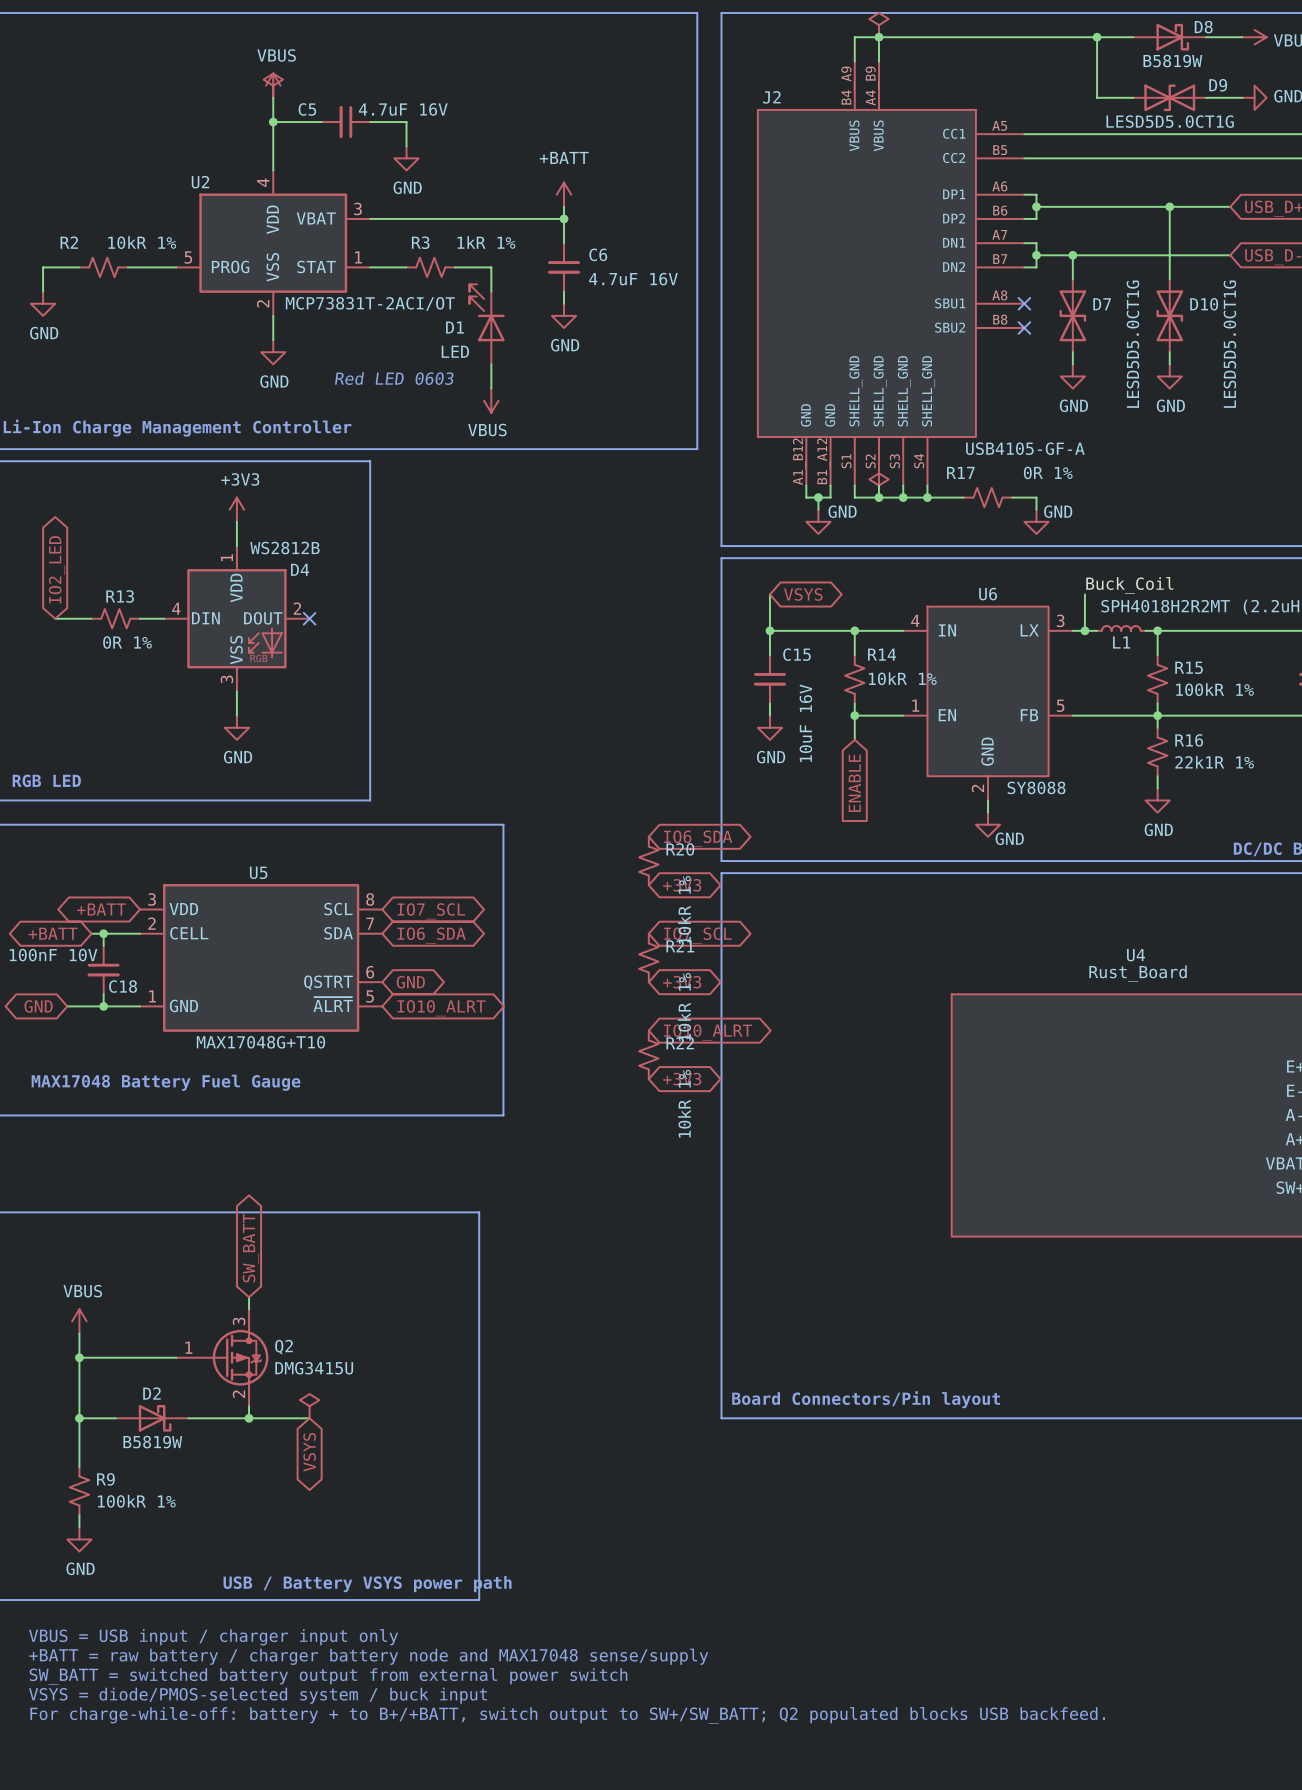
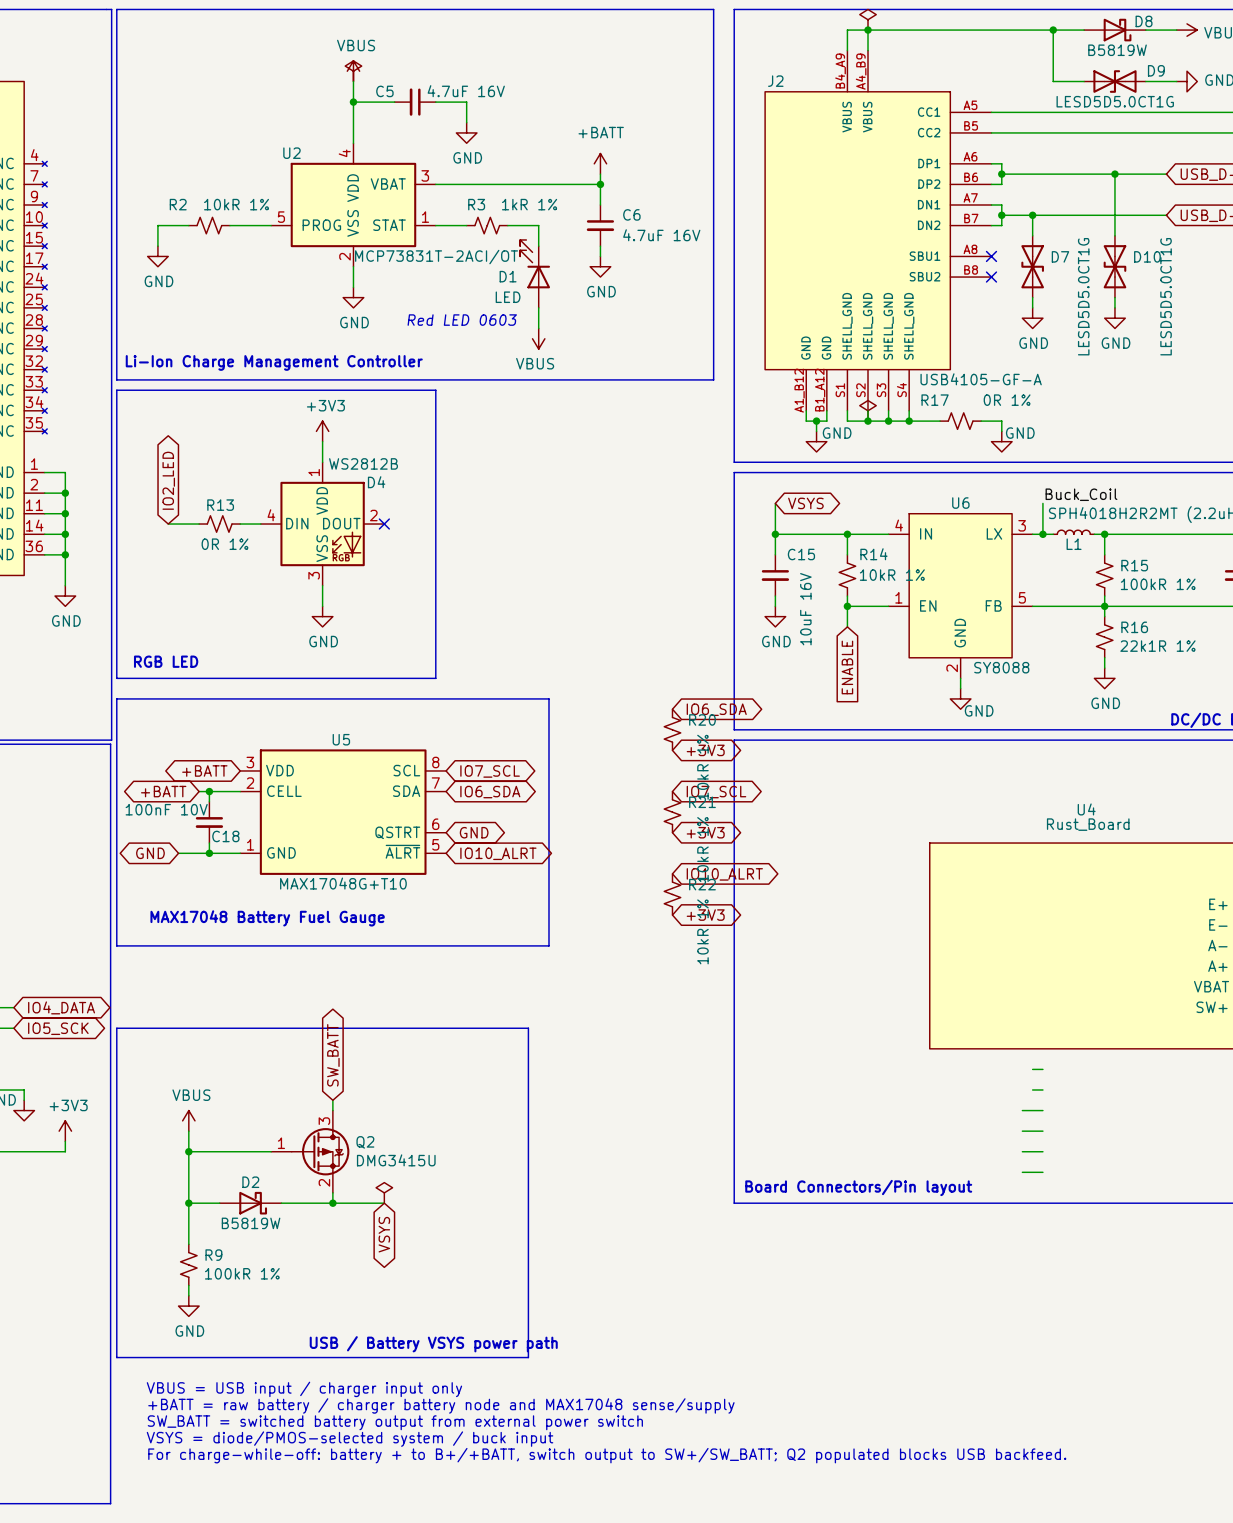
wire: none -> (1032, 1069) (1042, 1069)
wire: none -> (1032, 1089) (1042, 1089)
wire: none -> (1022, 1110) (1042, 1110)
wire: none -> (1022, 1131) (1042, 1131)
wire: none -> (1022, 1151) (1042, 1151)
wire: none -> (1022, 1172) (1042, 1172)

